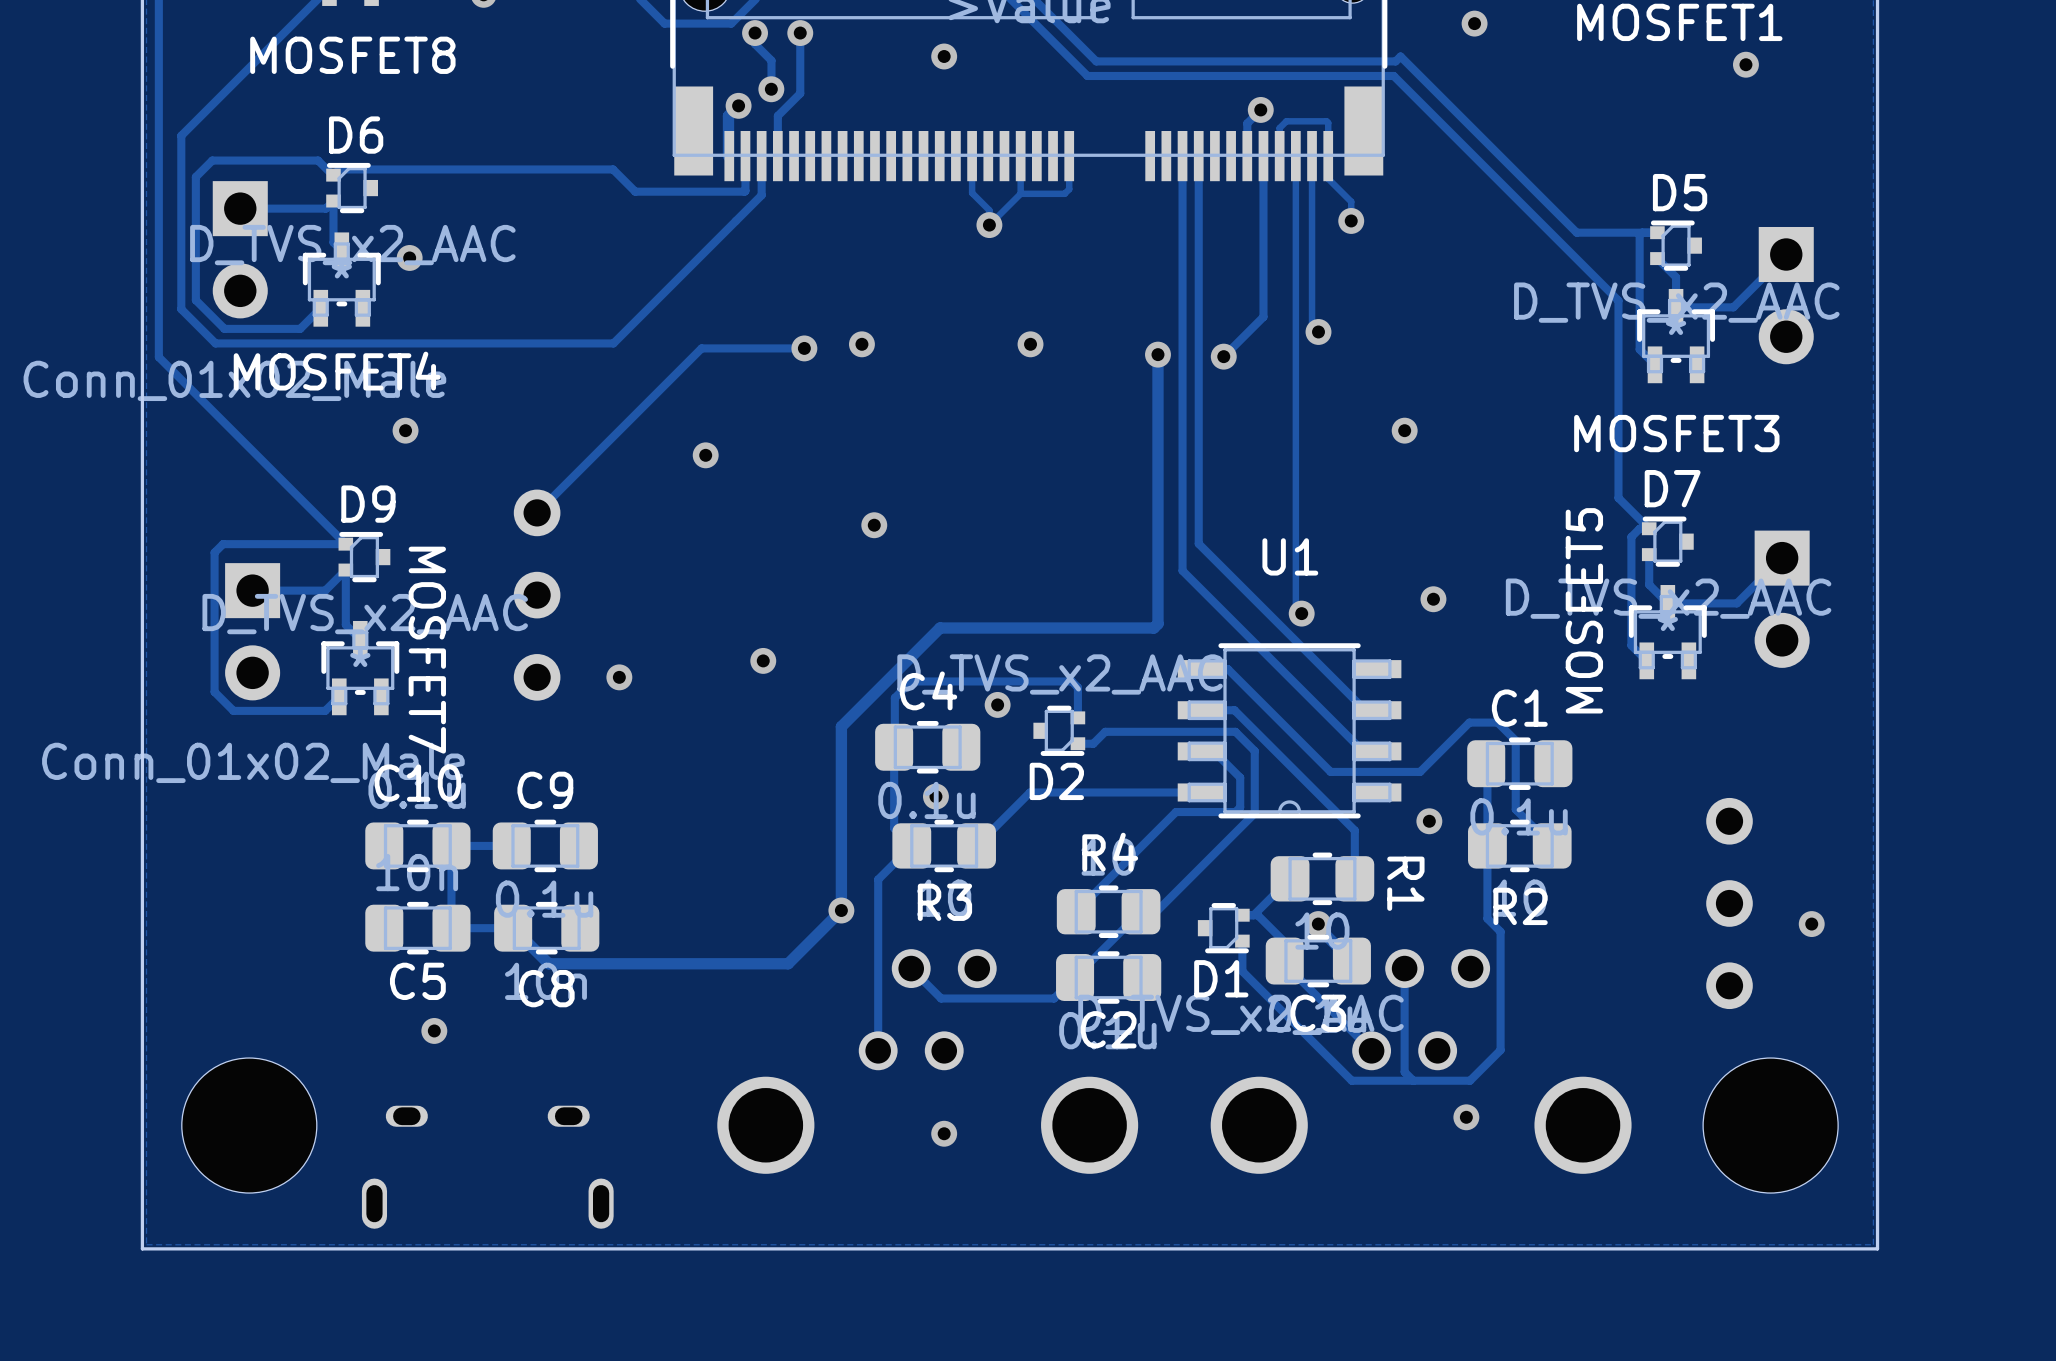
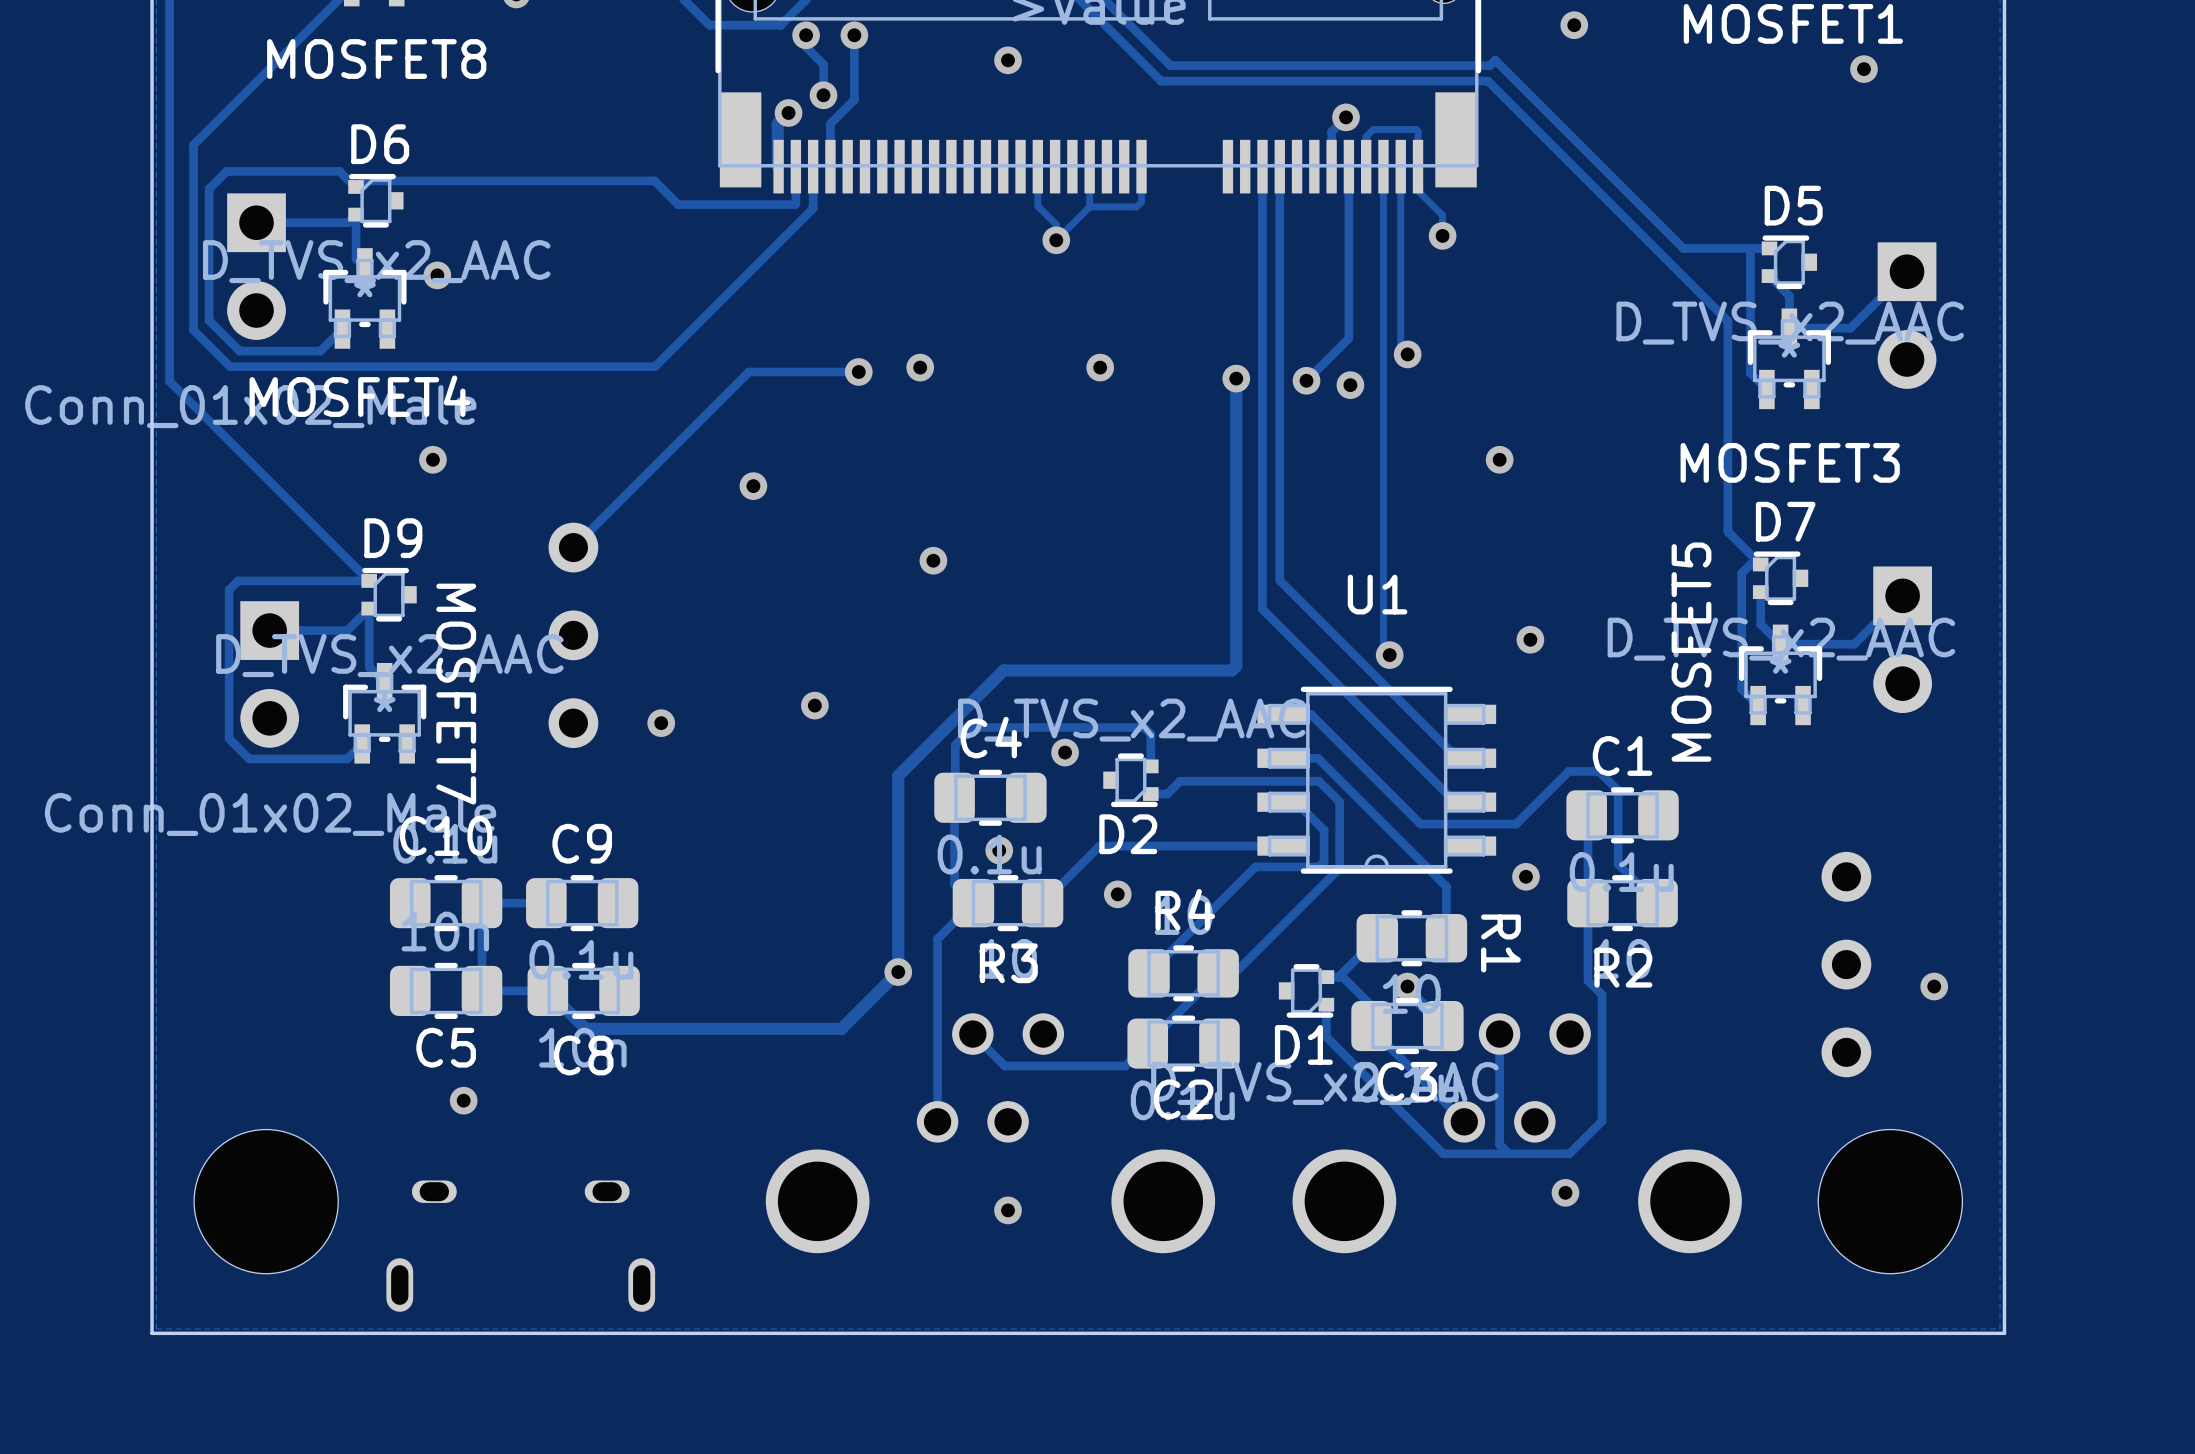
via: none -> (1350, 385)
via: none -> (1117, 894)

